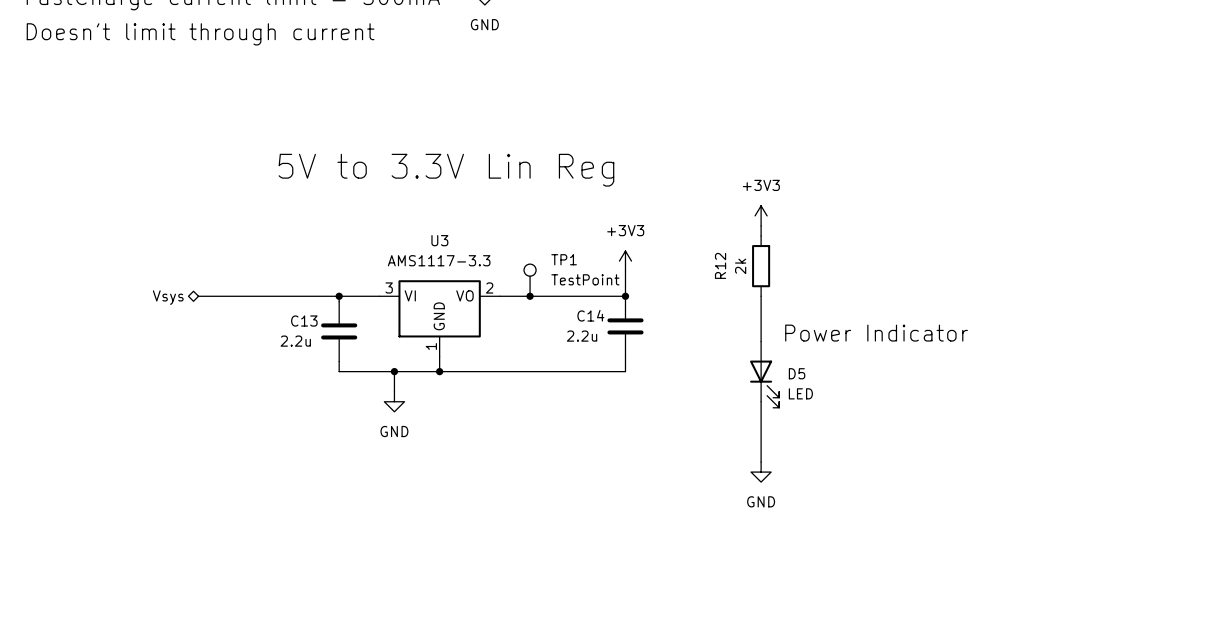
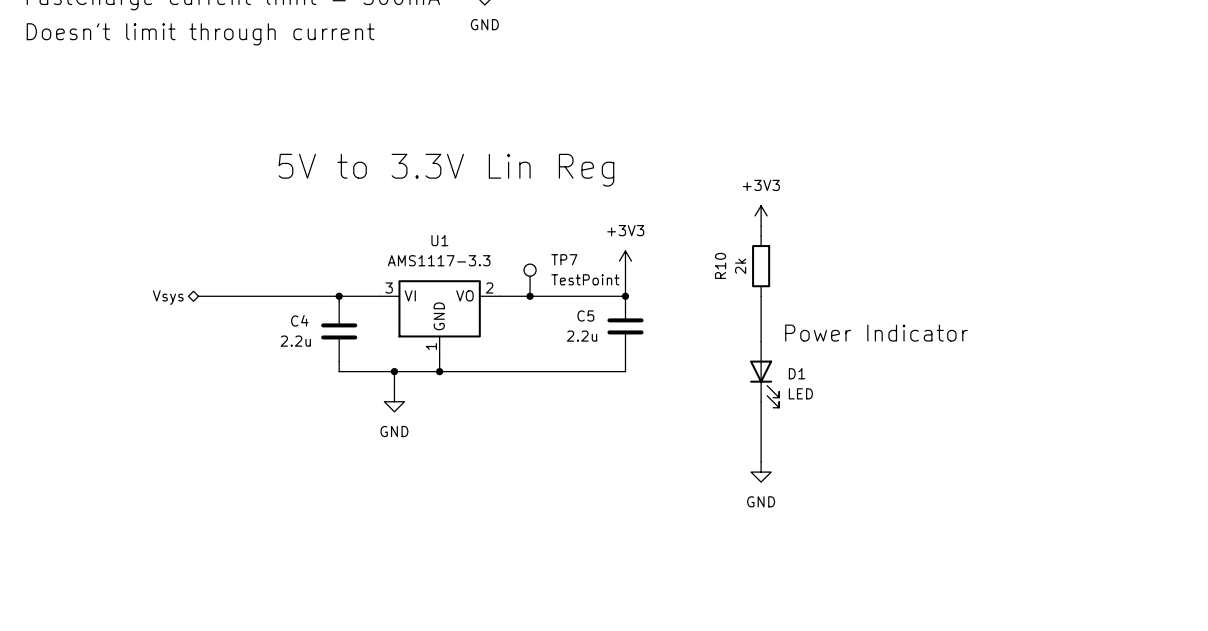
U3 name: U3 (439, 240) -> U1 (439, 240)
TP1 name: TP1 (564, 259) -> TP7 (564, 259)
R12 name: R12 (720, 265) -> R10 (720, 265)
C14 name: C14 (590, 315) -> C5 (585, 315)
C13 name: C13 (304, 321) -> C4 (299, 320)
D5 name: D5 (797, 373) -> D1 (797, 373)

